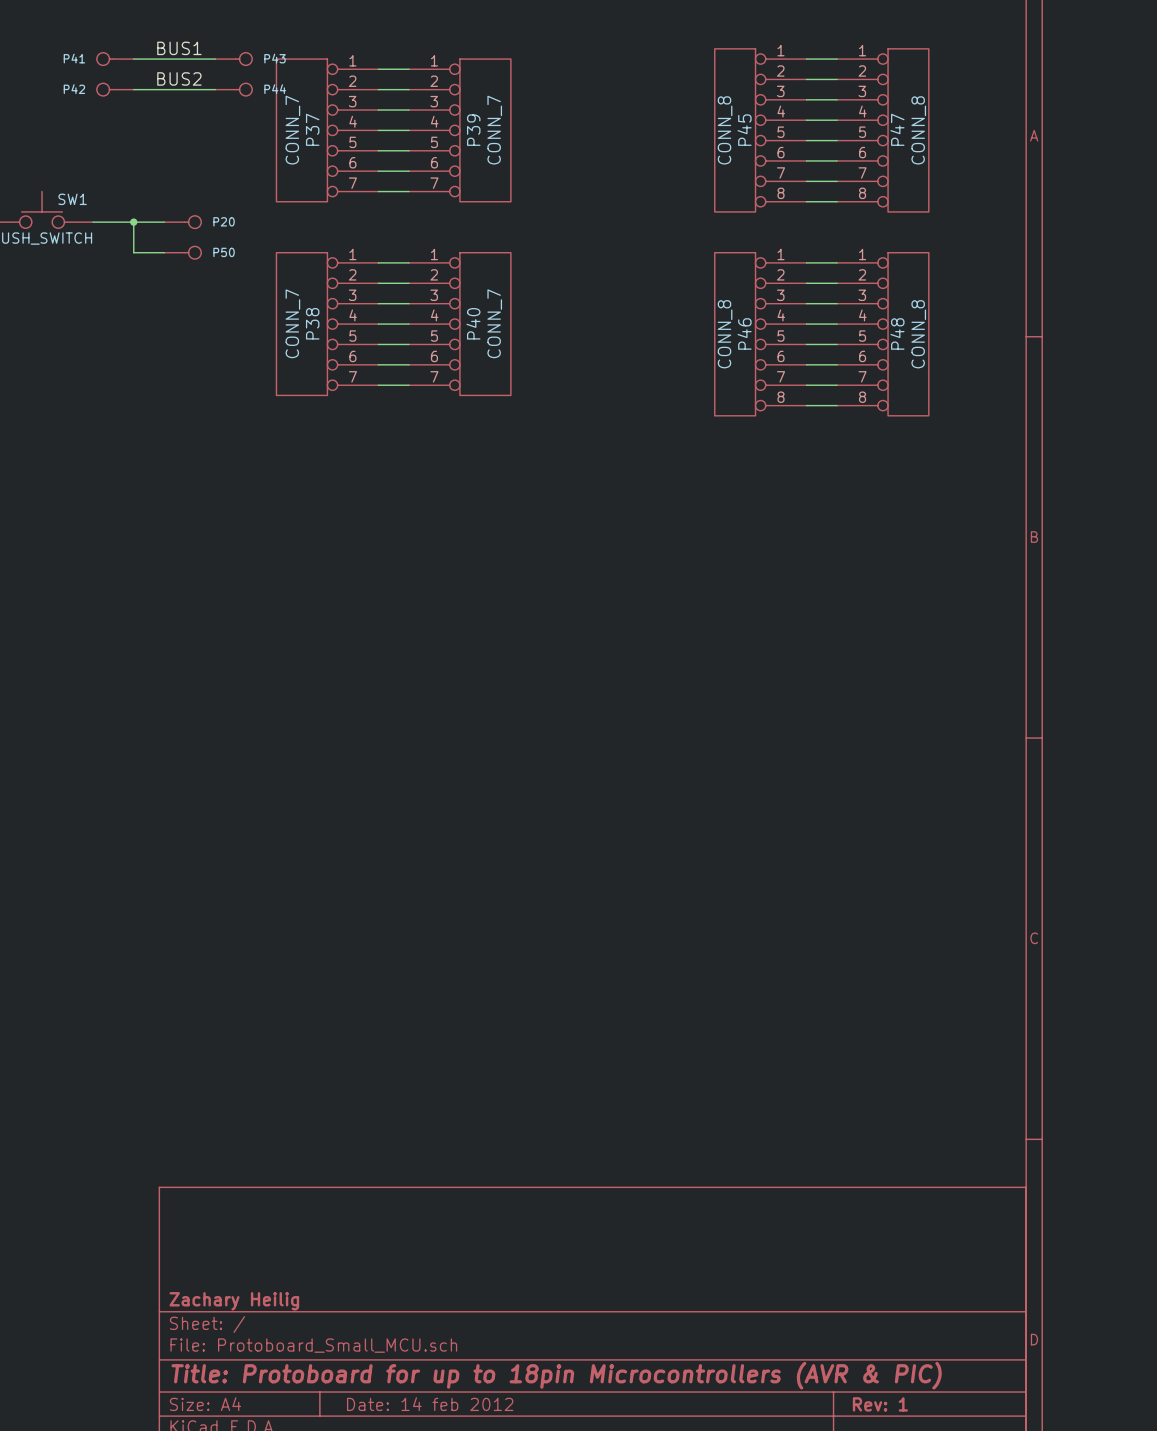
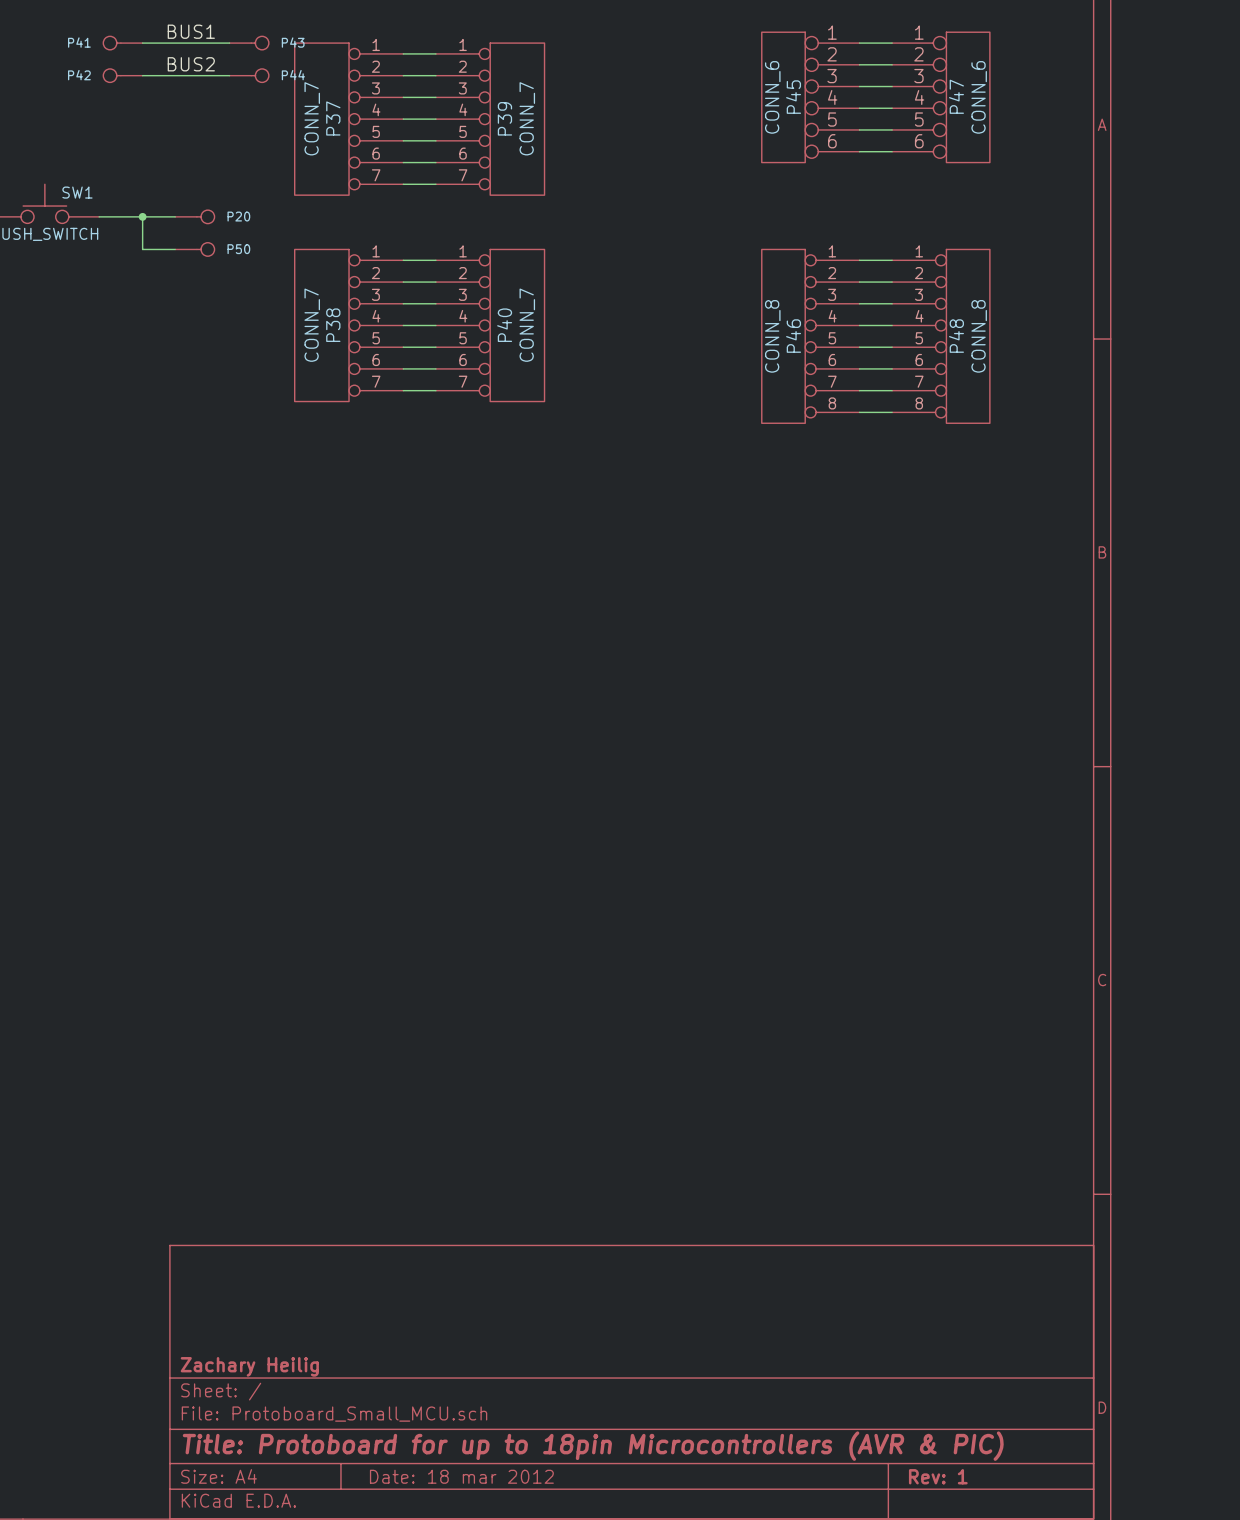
P45 symbol: [714, 48, 807, 212] -> [761, 32, 860, 163]
P47 symbol: [837, 48, 929, 212] -> [892, 32, 990, 163]
P45 value: CONN_8 (725, 130) -> CONN_6 (772, 97)
P47 value: CONN_8 (918, 130) -> CONN_6 (979, 97)
wire: (806, 181) (837, 181) -> none
wire: (806, 201) (837, 201) -> none
title block: Date: 14 feb 2012 (430, 1404) -> Date: 18 mar 2012 (461, 1476)

